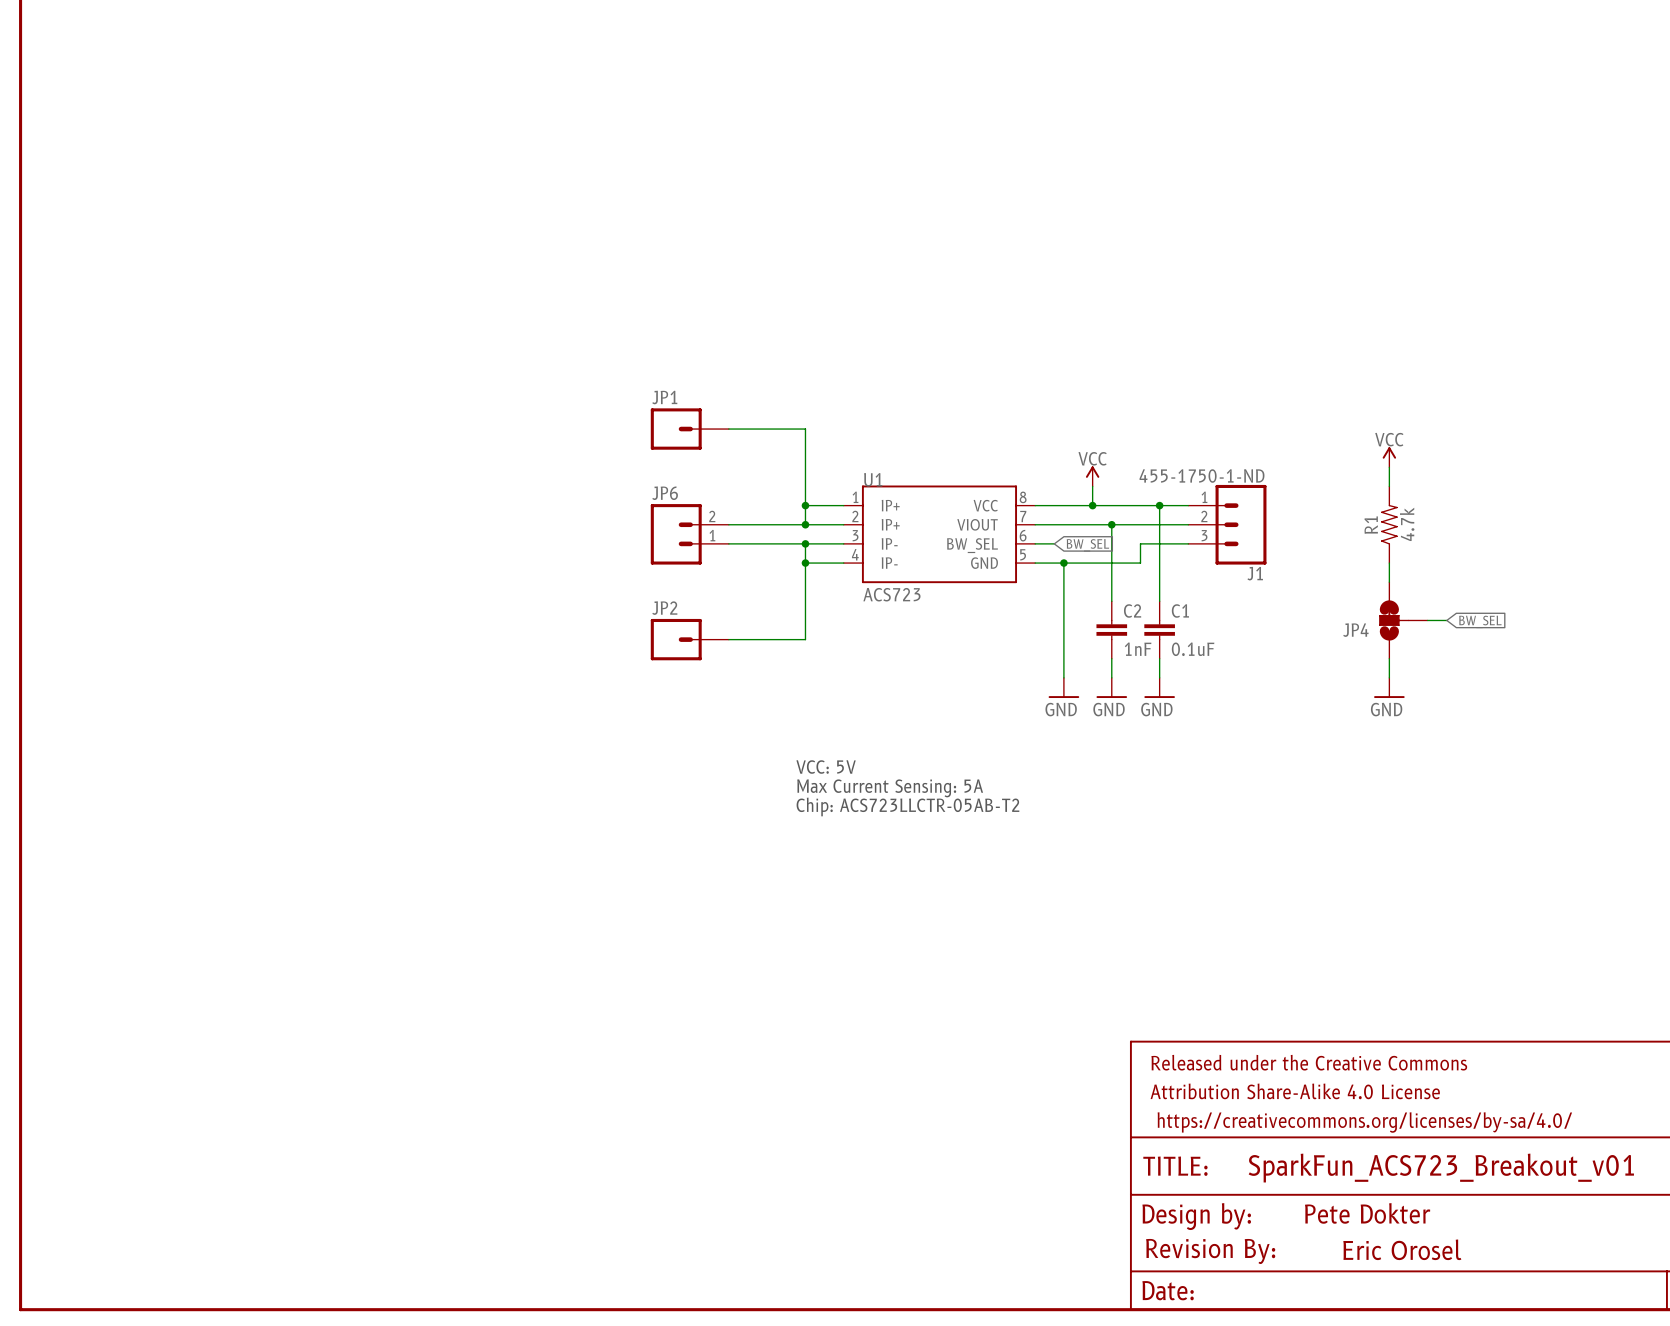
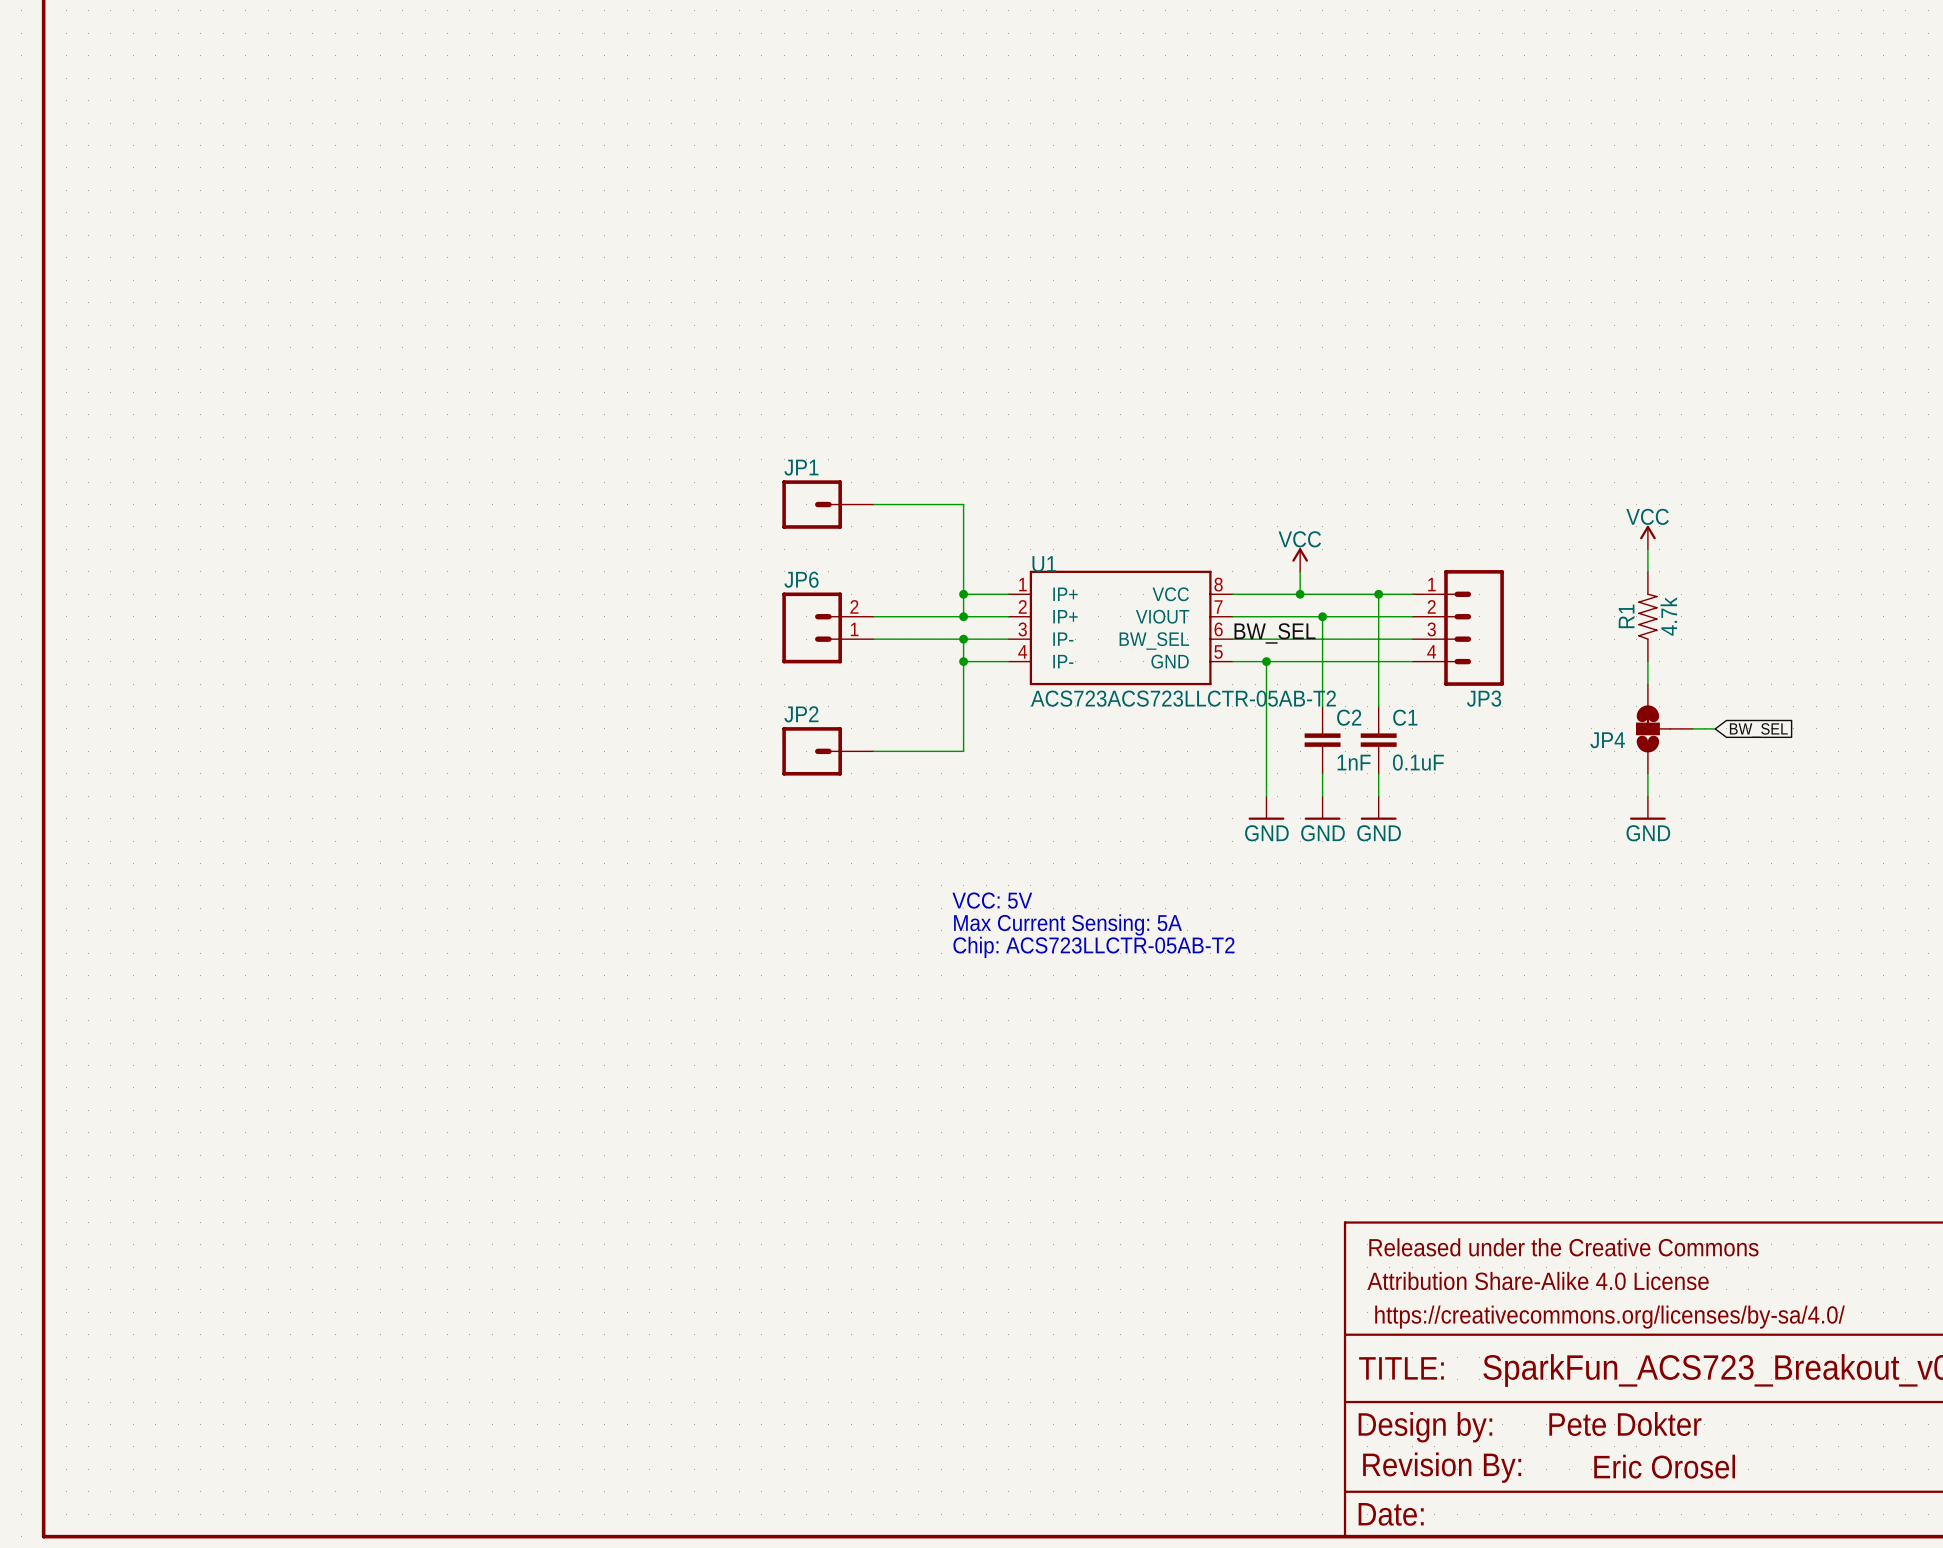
J1: 455-1750-1-ND (1227, 524) -> none
JP3: none -> (1458, 627)
label: none -> BW_SEL (1275, 633)
wire: none -> (1255, 639) (1356, 639)
wire: (1140, 543) (1140, 563) -> (1412, 661) (1356, 661)
global label: BW_SEL (1087, 545) -> none
U1 value: ACS723 (891, 594) -> ACS723ACS723LLCTR-05AB-T2 (1183, 698)

